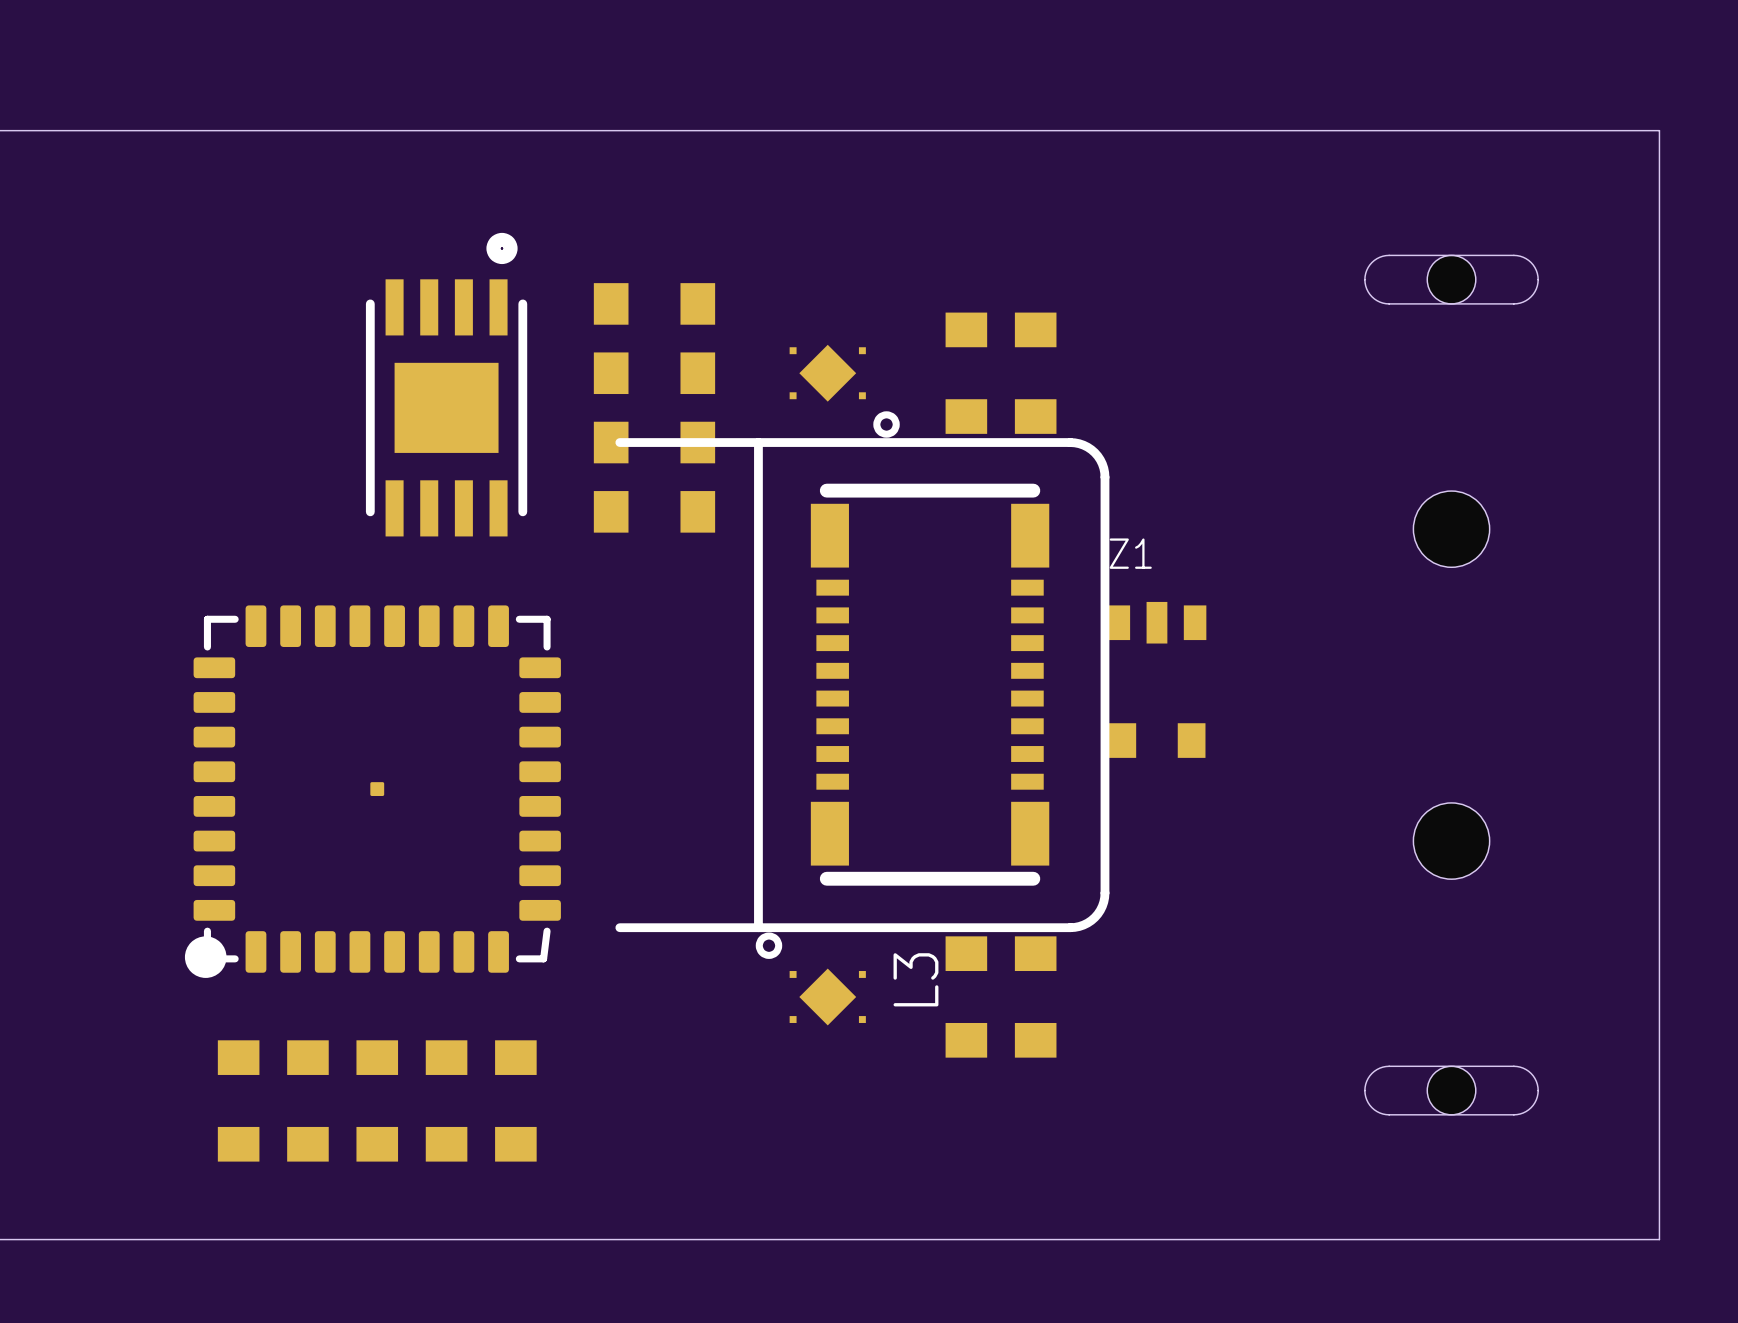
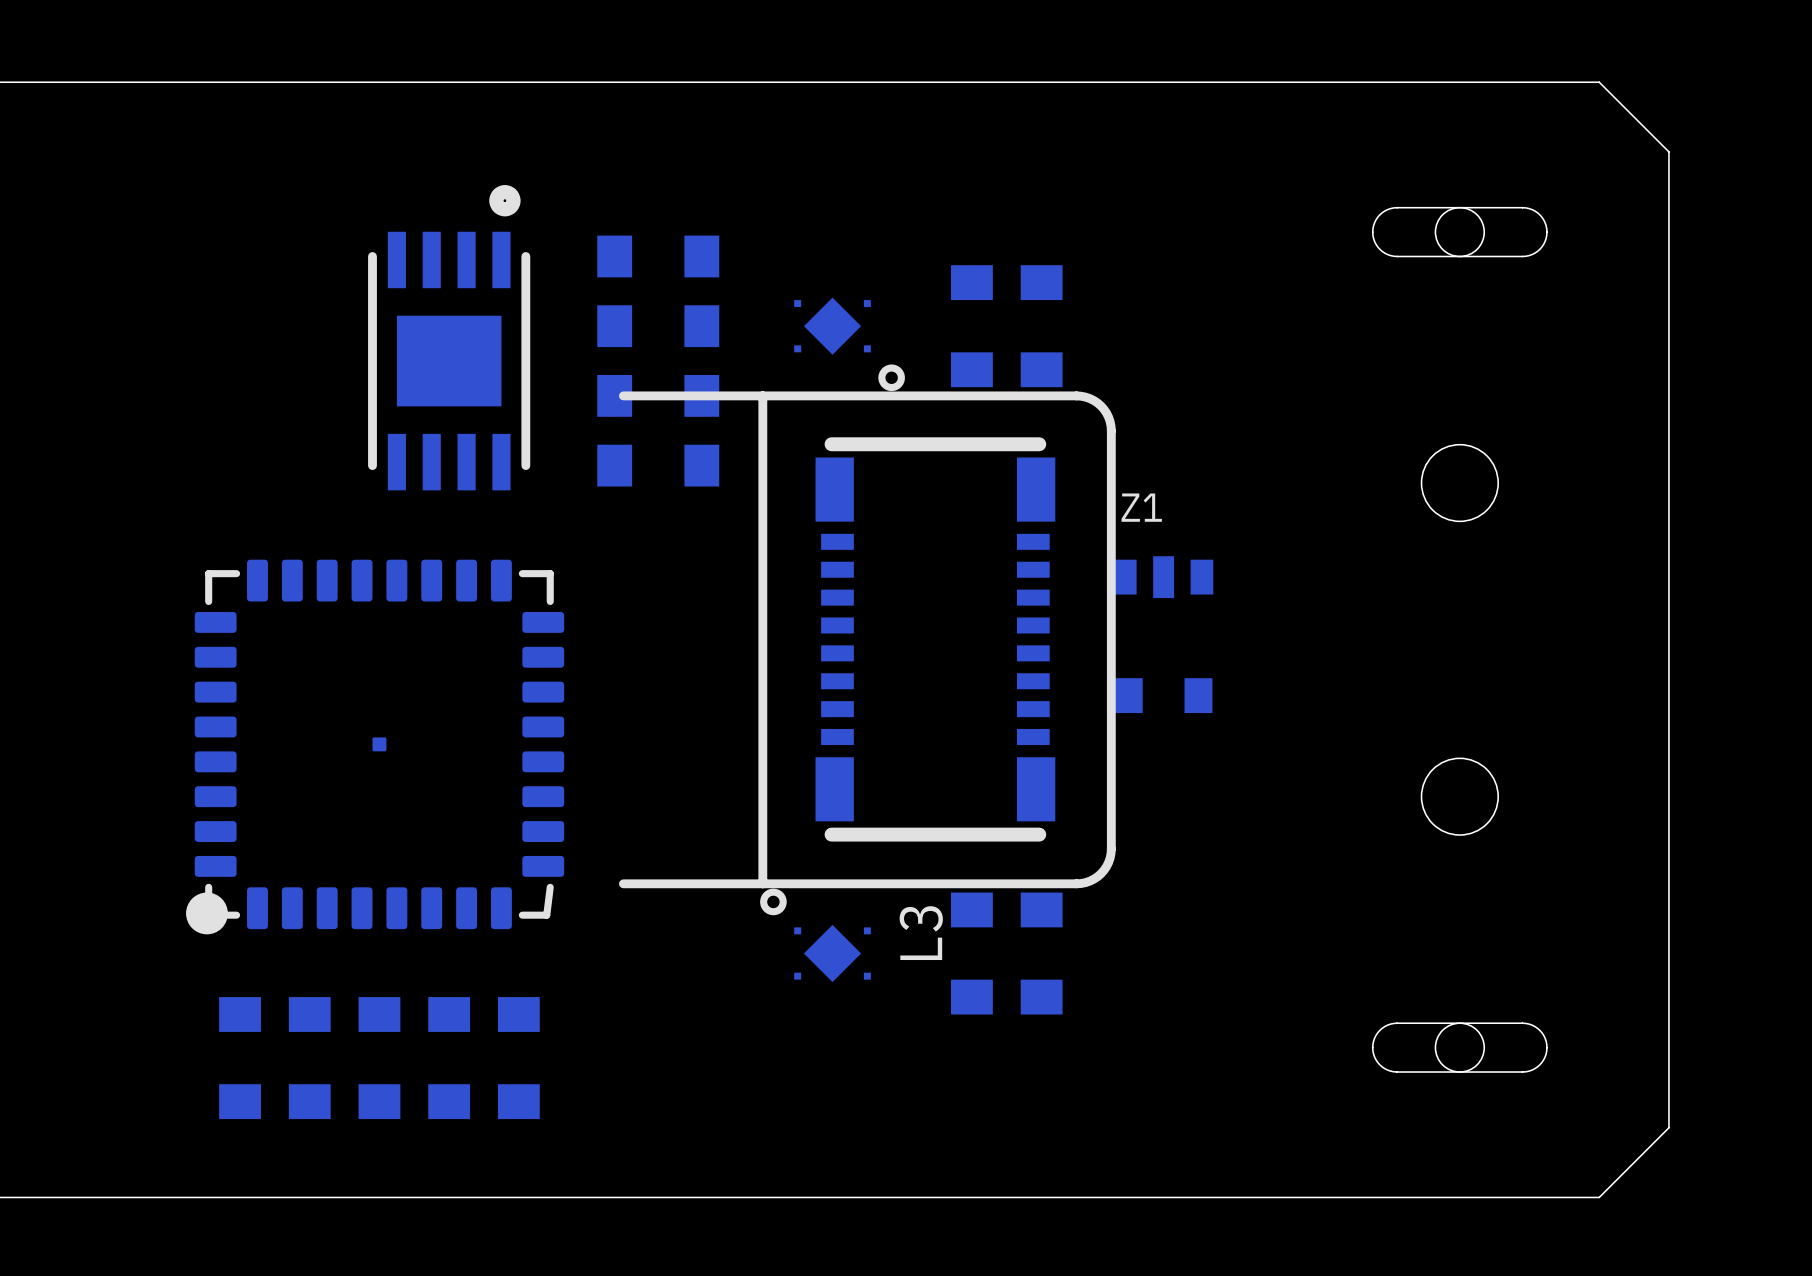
board edge: (1590, 130) (1659, 130) (1659, 199) -> (1599, 82) (1668, 151)
board edge: (1659, 1170) (1659, 1239) (1590, 1239) -> (1668, 1127) (1599, 1197)

